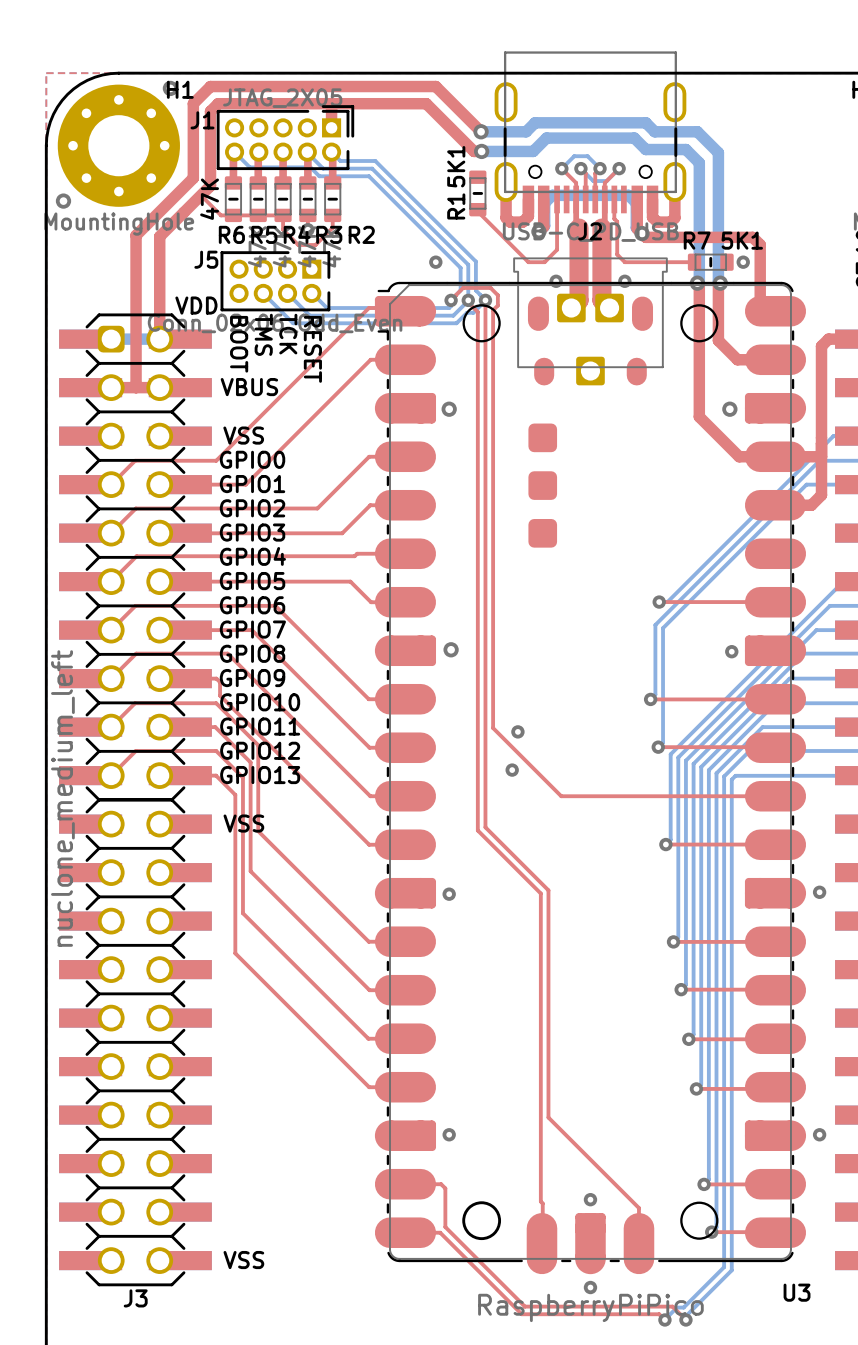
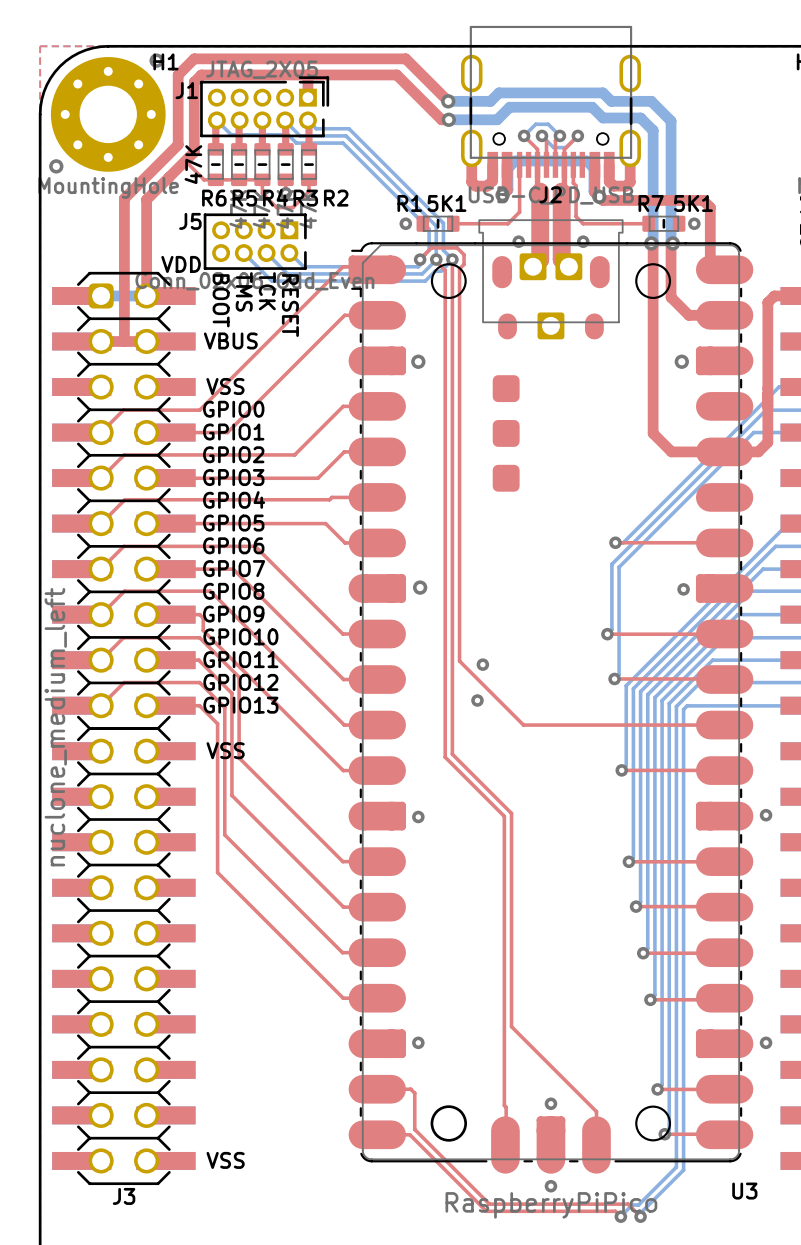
R1 rotation: 0° (477, 193) -> 90° clockwise (438, 223)
R1 position: (477, 193) -> (438, 223)
top track: (474, 208) (528, 262) -> (453, 223) (492, 223)
top track: (699, 416) (739, 456) (821, 456) -> (653, 368) (653, 433) (671, 451) (710, 451)

